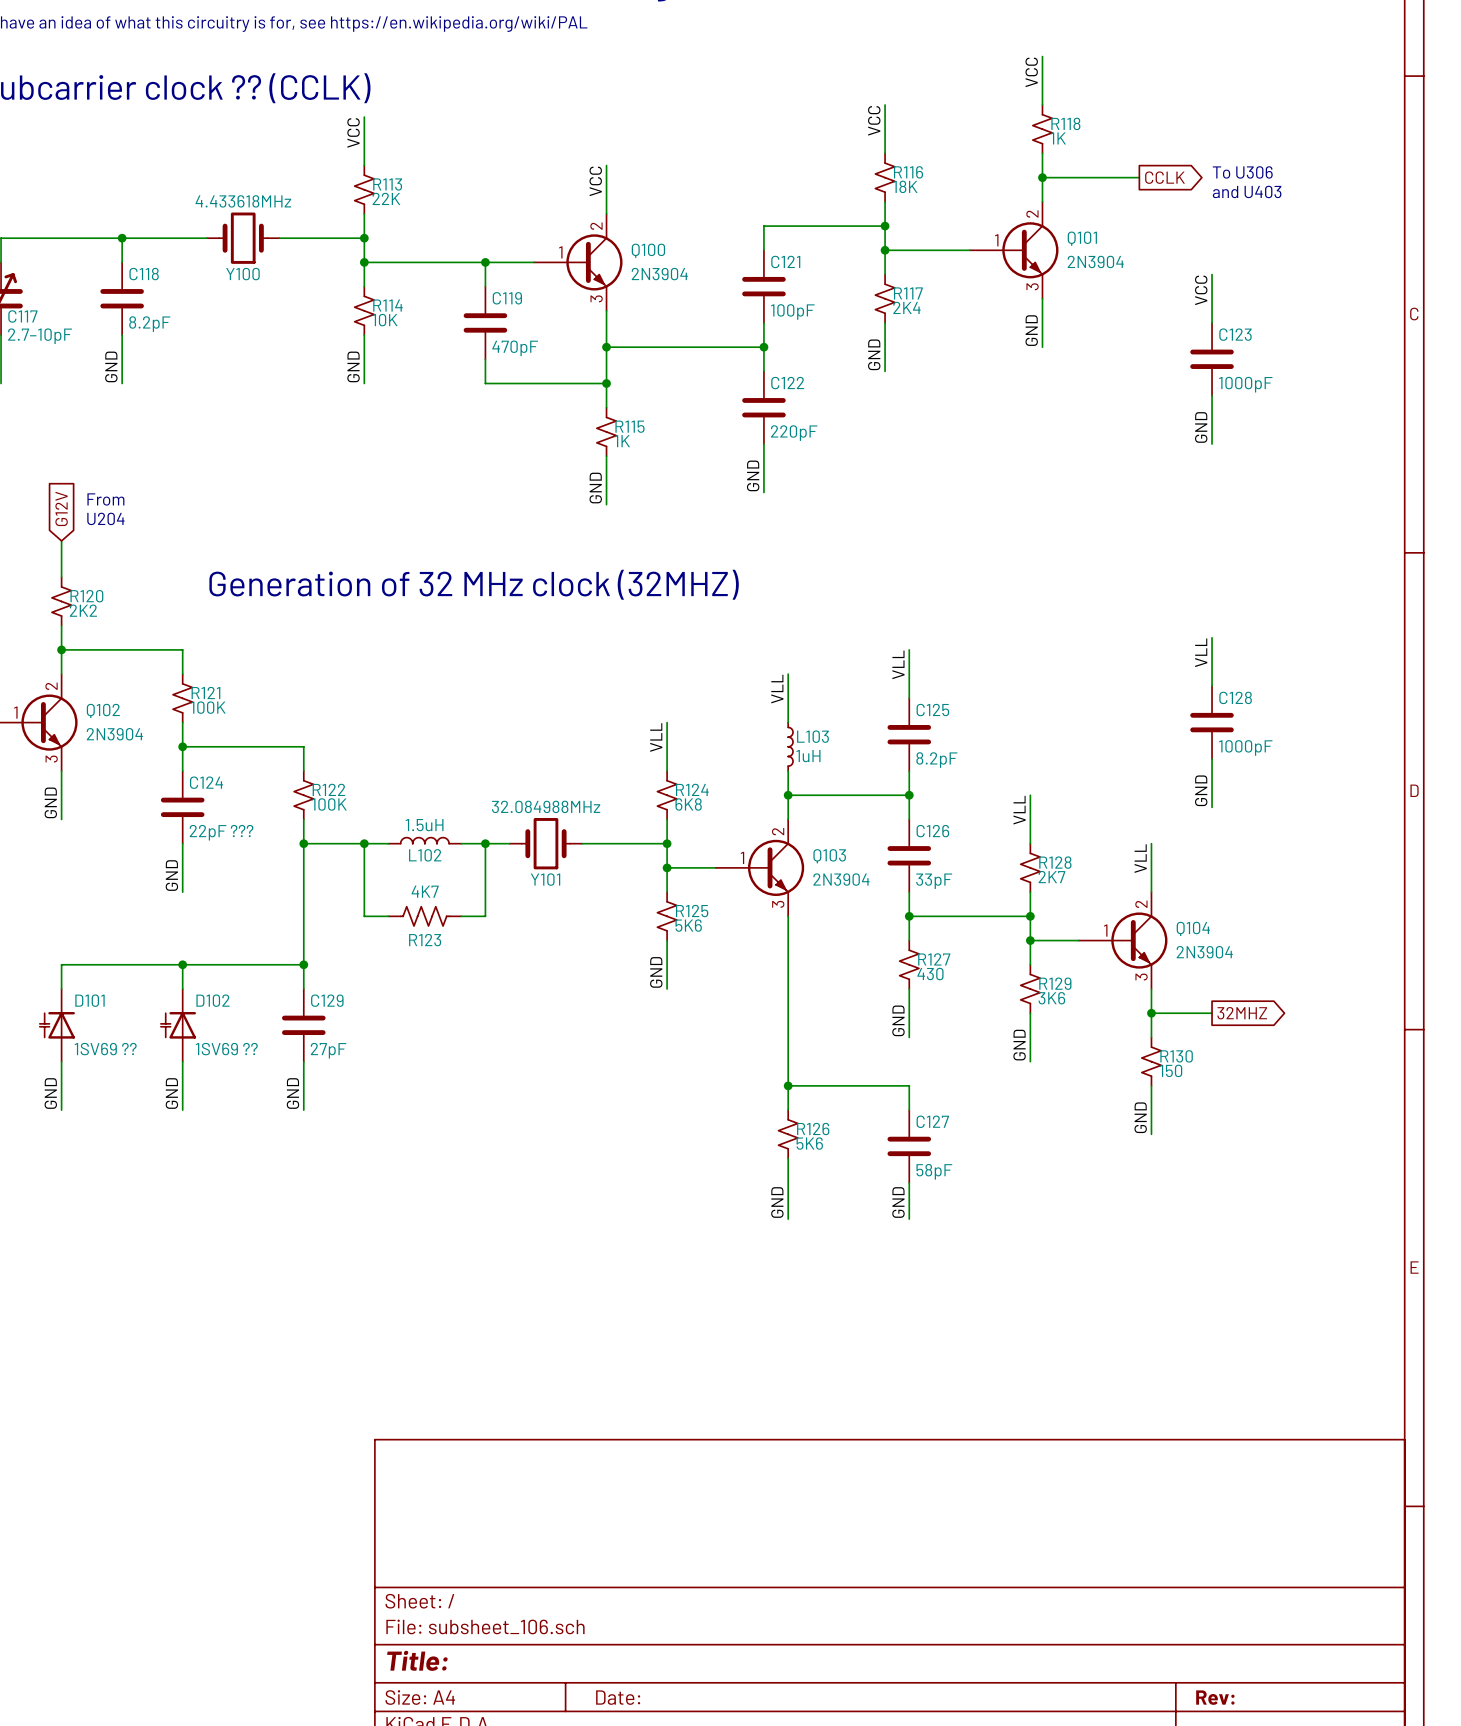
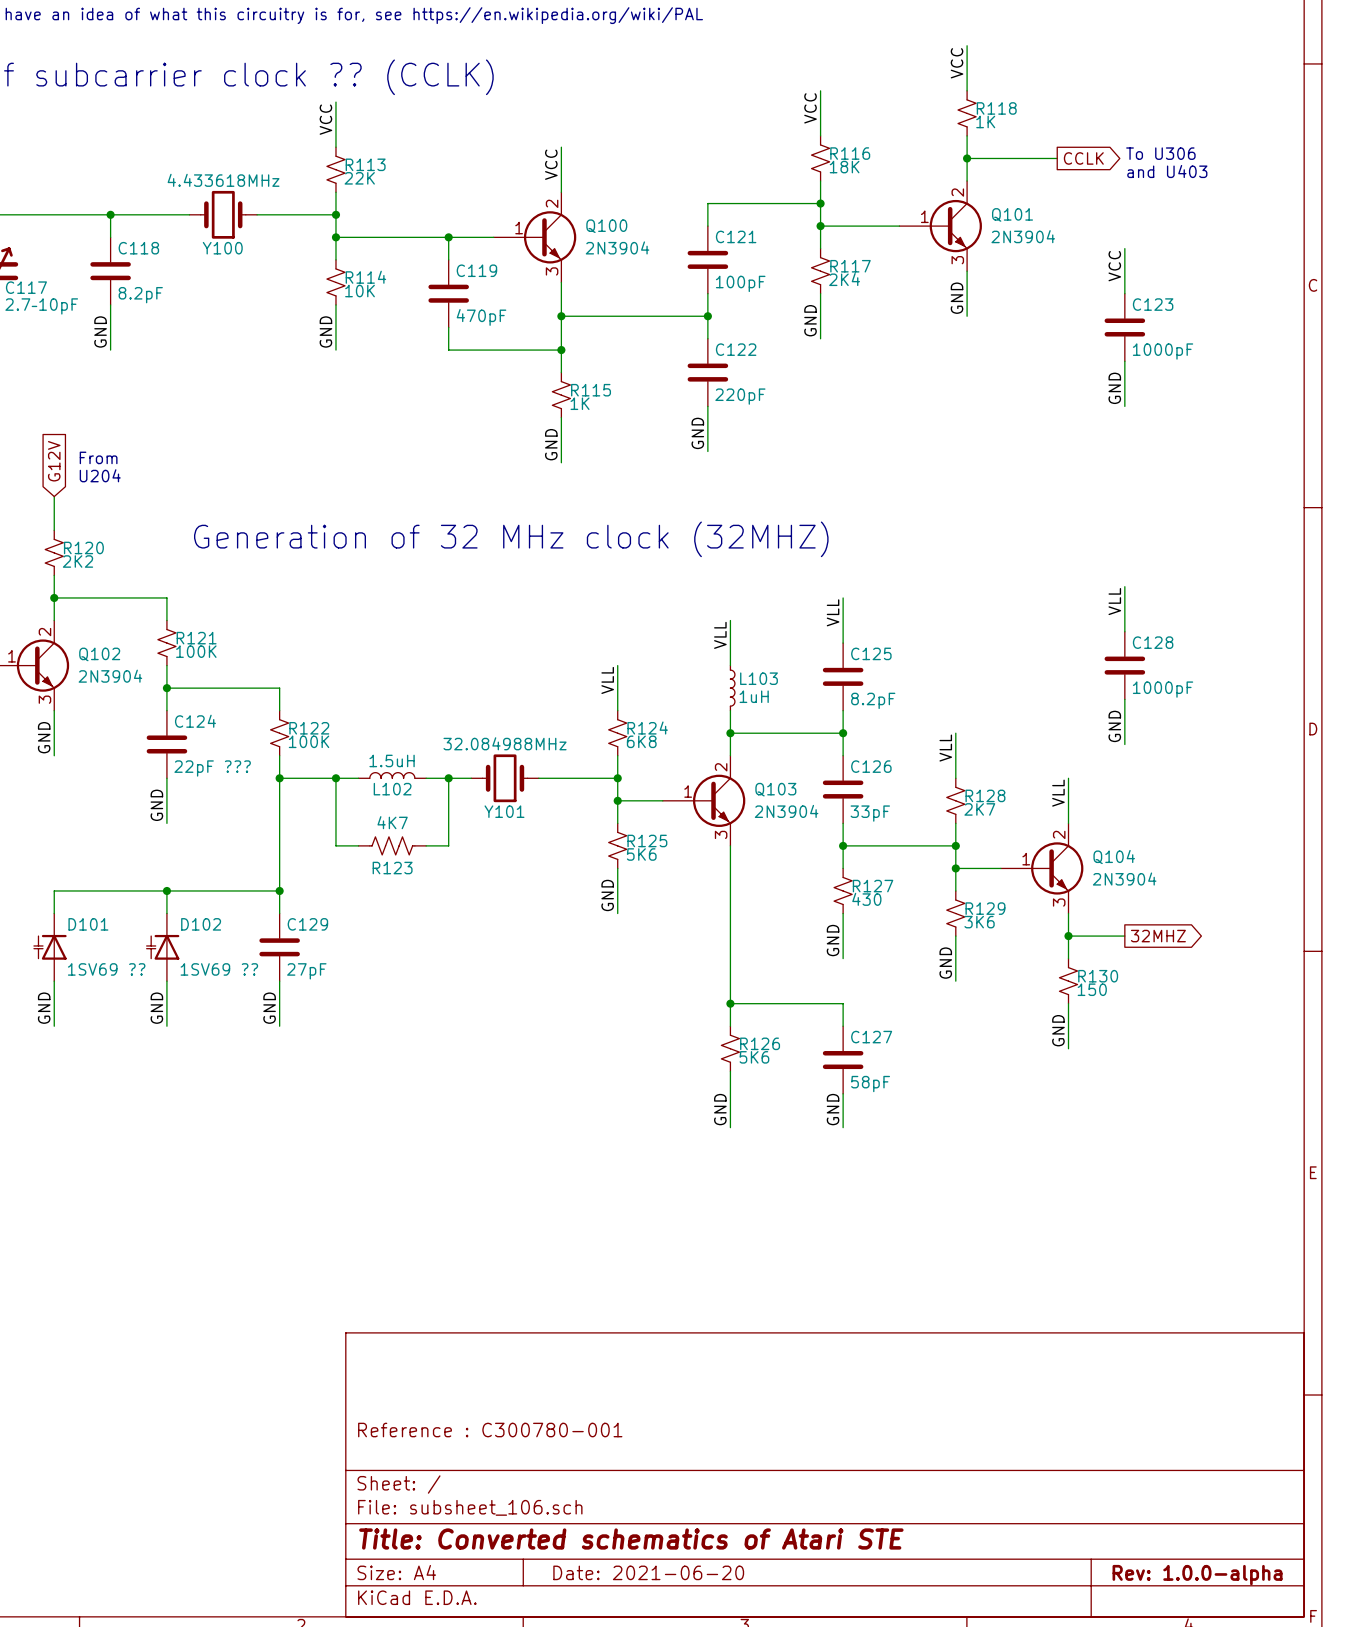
title block: none -> Reference : C300780-001 (490, 1430)
title block: Title: (417, 1660) -> Title: Converted schematics of Atari STE (631, 1539)
title block: Date: (618, 1697) -> Date: 2021-06-20 (648, 1572)
title block: Rev: (1215, 1697) -> Rev: 1.0.0-alpha (1197, 1575)

